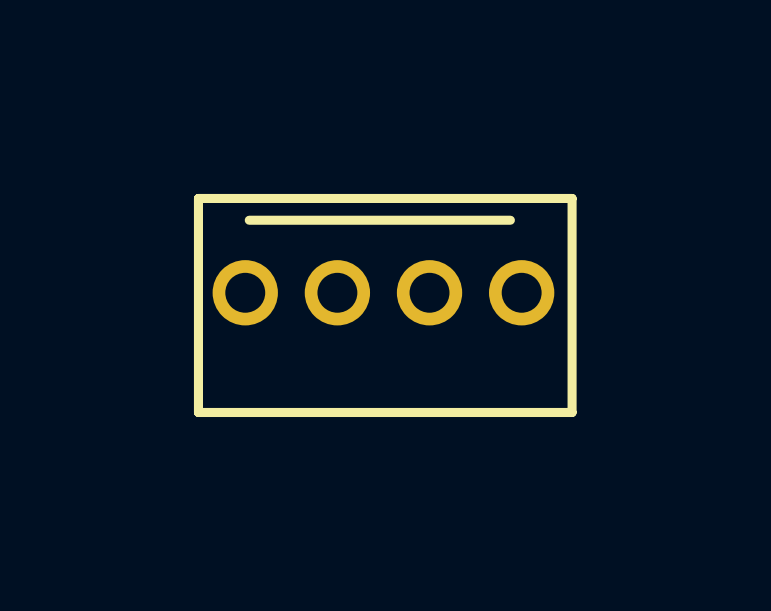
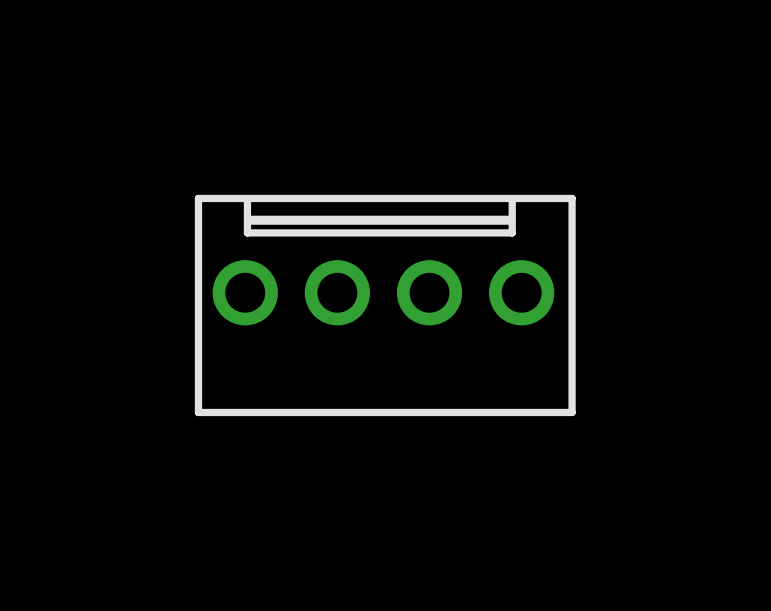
part footprint: [193, 193, 577, 418] -> [194, 194, 576, 417]

